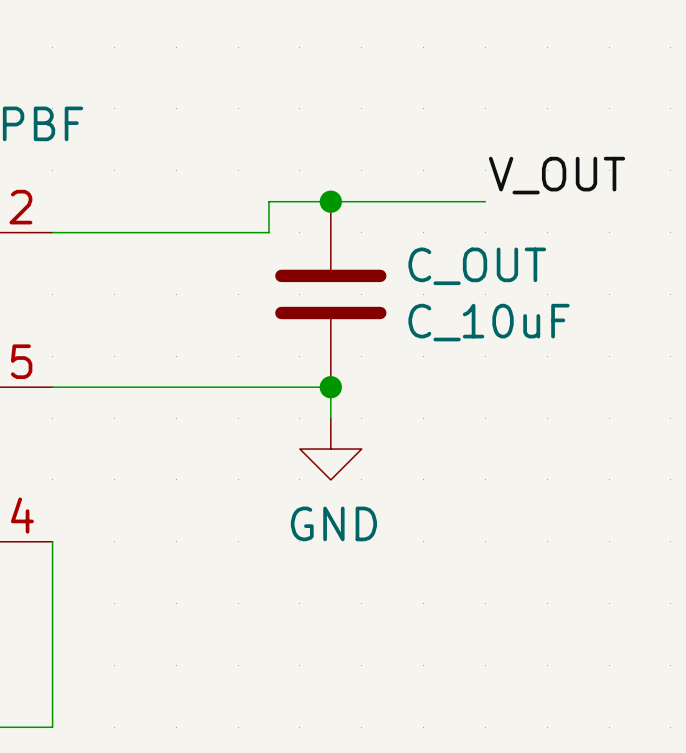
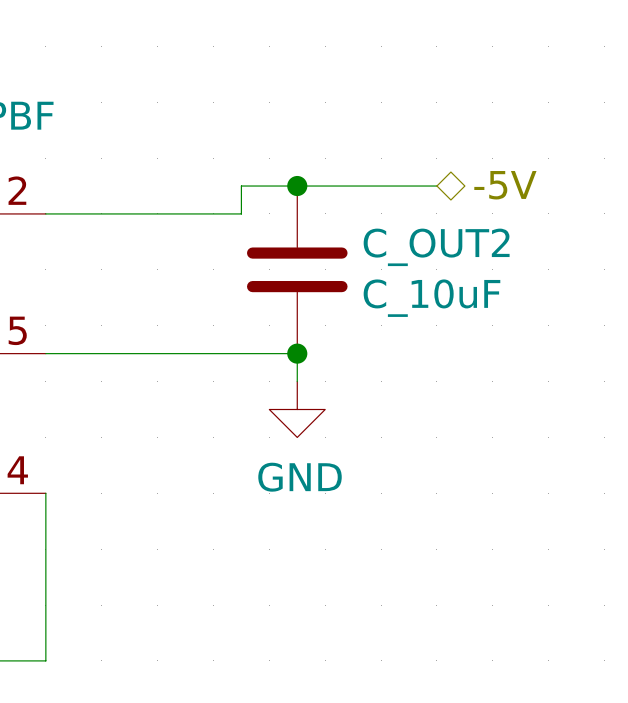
label: V_OUT (557, 175) -> none
hierarchical label: none -> -5V (505, 185)
C_OUT name: C_OUT (477, 266) -> C_OUT2 (436, 247)

